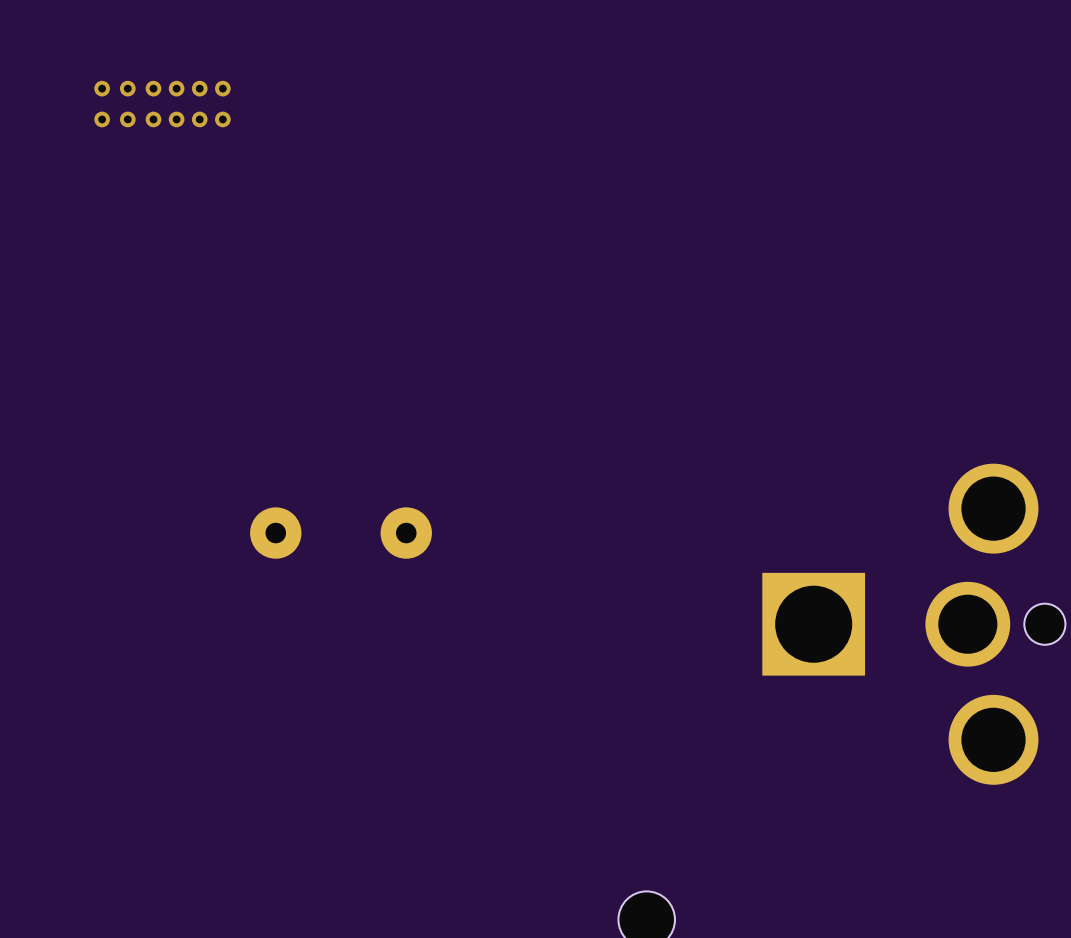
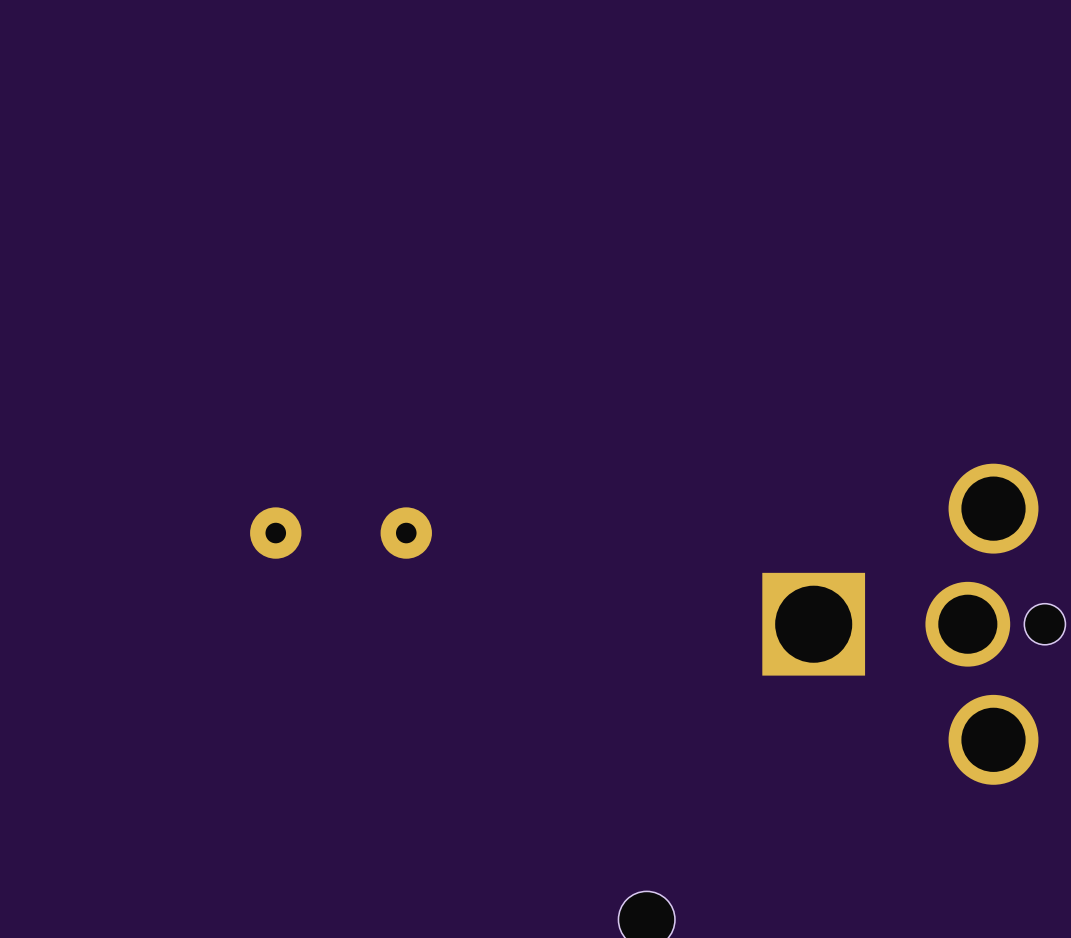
via: (102, 88) -> none
via: (127, 88) -> none
via: (153, 88) -> none
via: (176, 88) -> none
via: (199, 88) -> none
via: (222, 88) -> none
via: (102, 119) -> none
via: (127, 119) -> none
via: (153, 119) -> none
via: (176, 119) -> none
via: (199, 119) -> none
via: (222, 119) -> none

